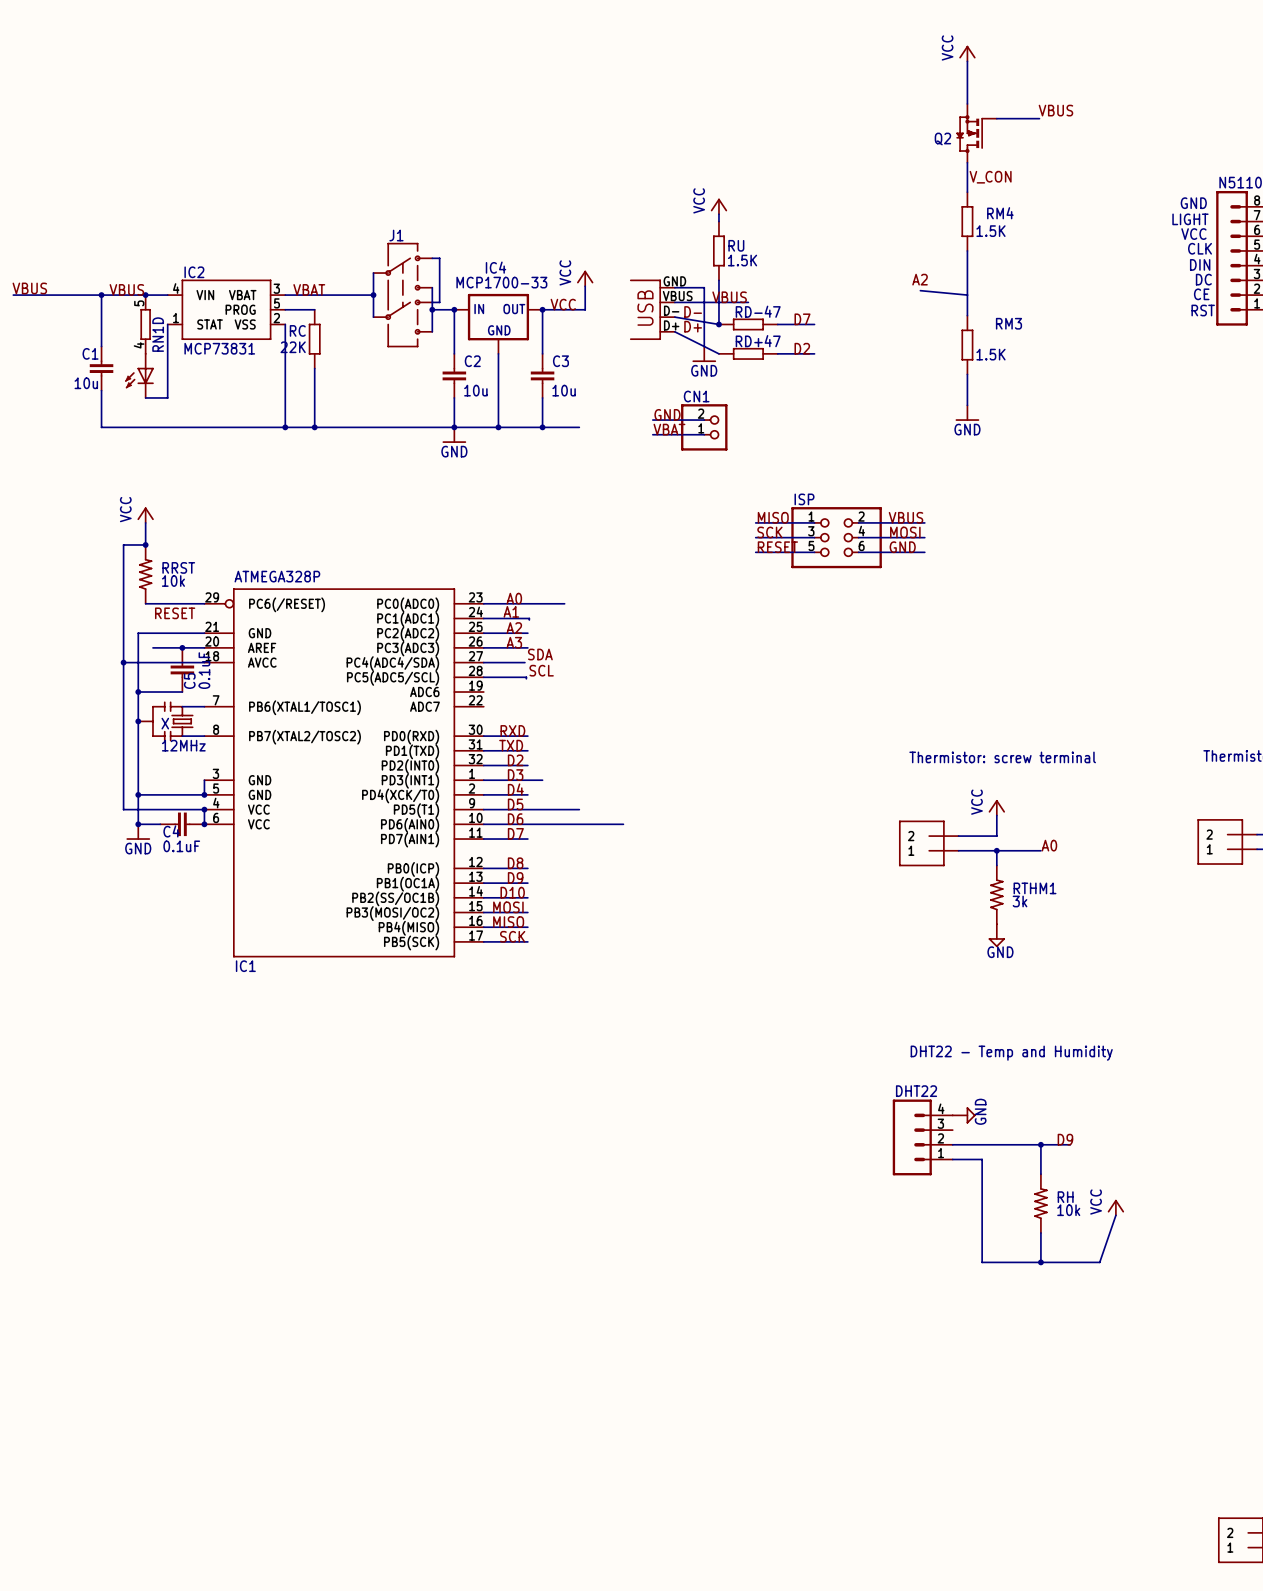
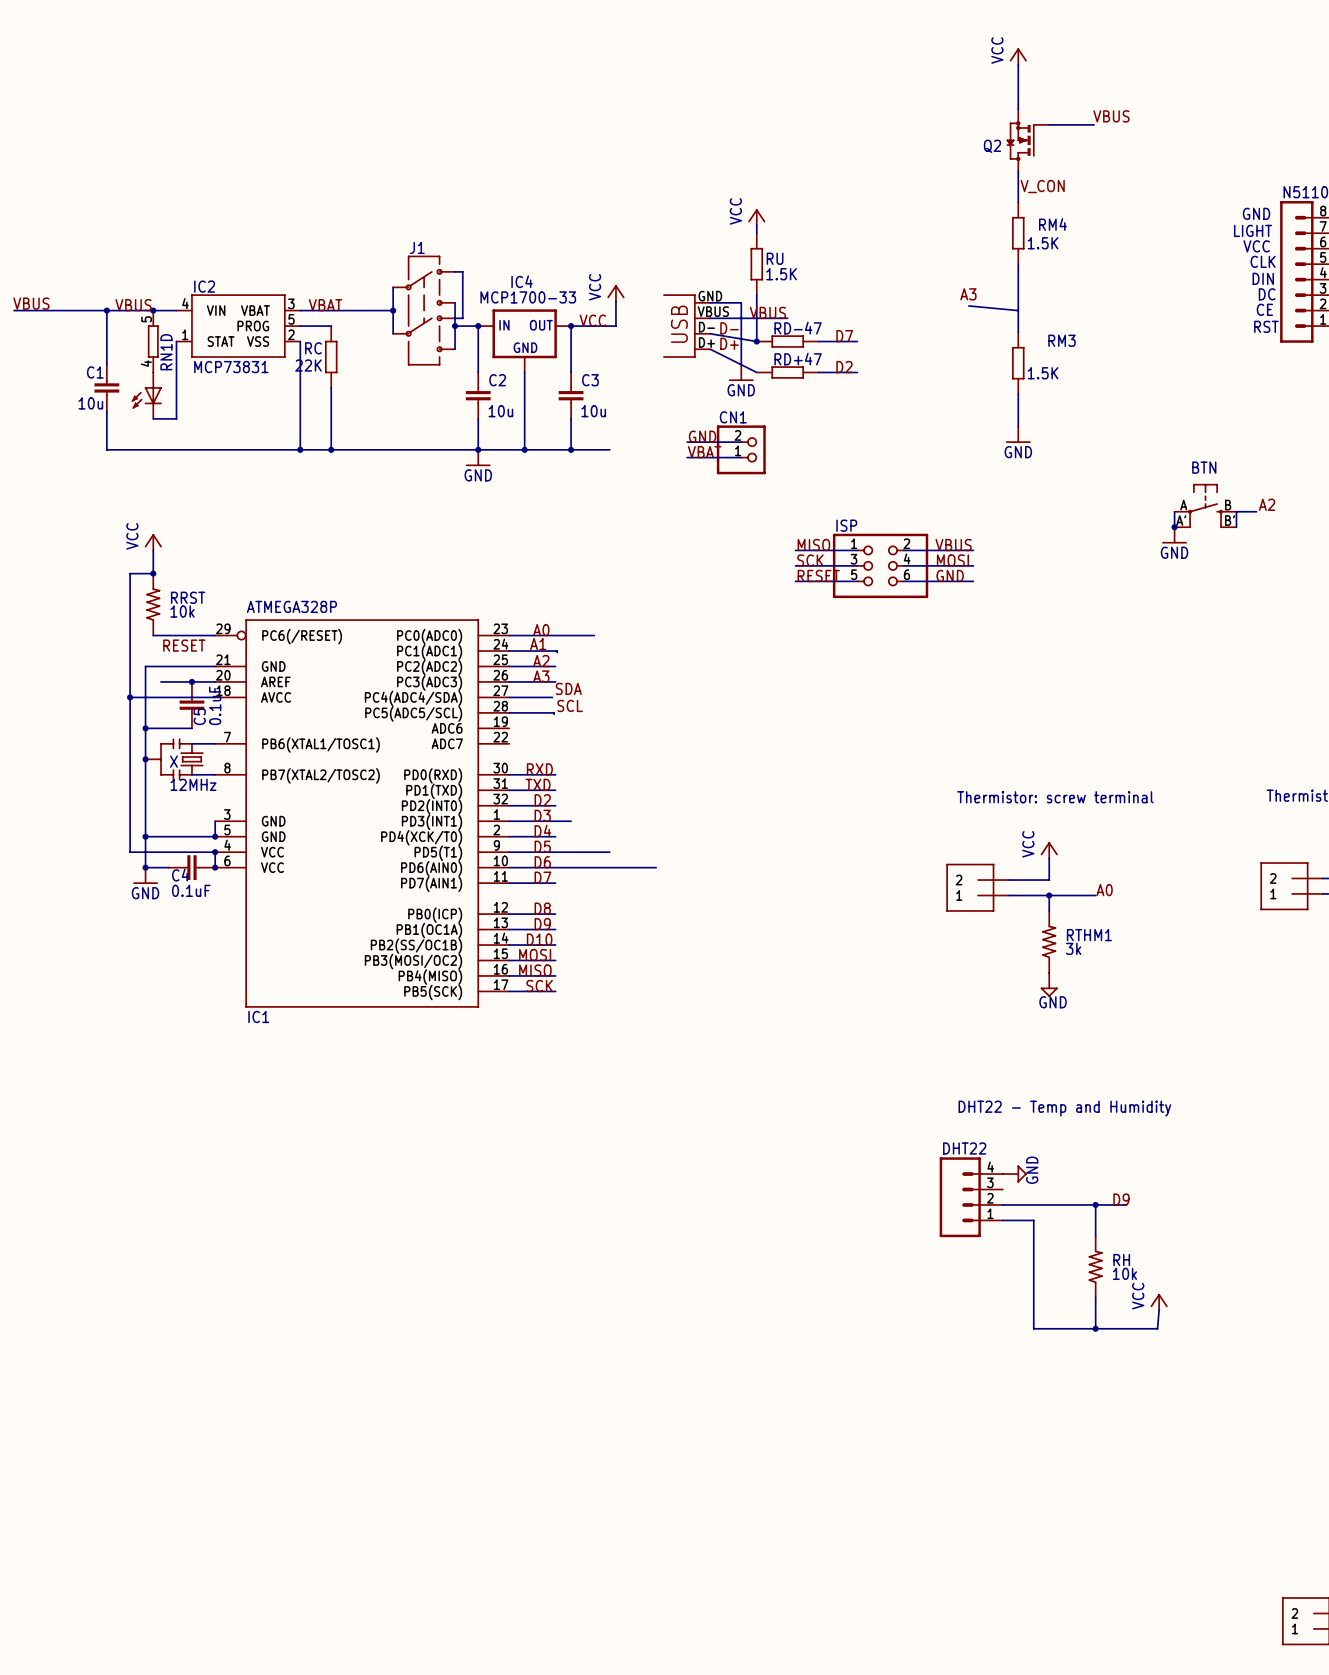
label: A2 (920, 279) -> A3 (968, 294)
label: none -> A2 (1267, 504)
BTN: none -> (1205, 505)
wire: none -> (1174, 511) (1174, 527)
wire: none -> (1256, 511) (1236, 511) (1236, 527)
junction: none -> (1174, 527)
power symbol: none -> GND (1174, 535)
power symbol position: VCC (1115, 1207) -> VCC (1159, 1302)
wire: (1115, 1215) (1099, 1262) -> (1159, 1310) (1157, 1328)

